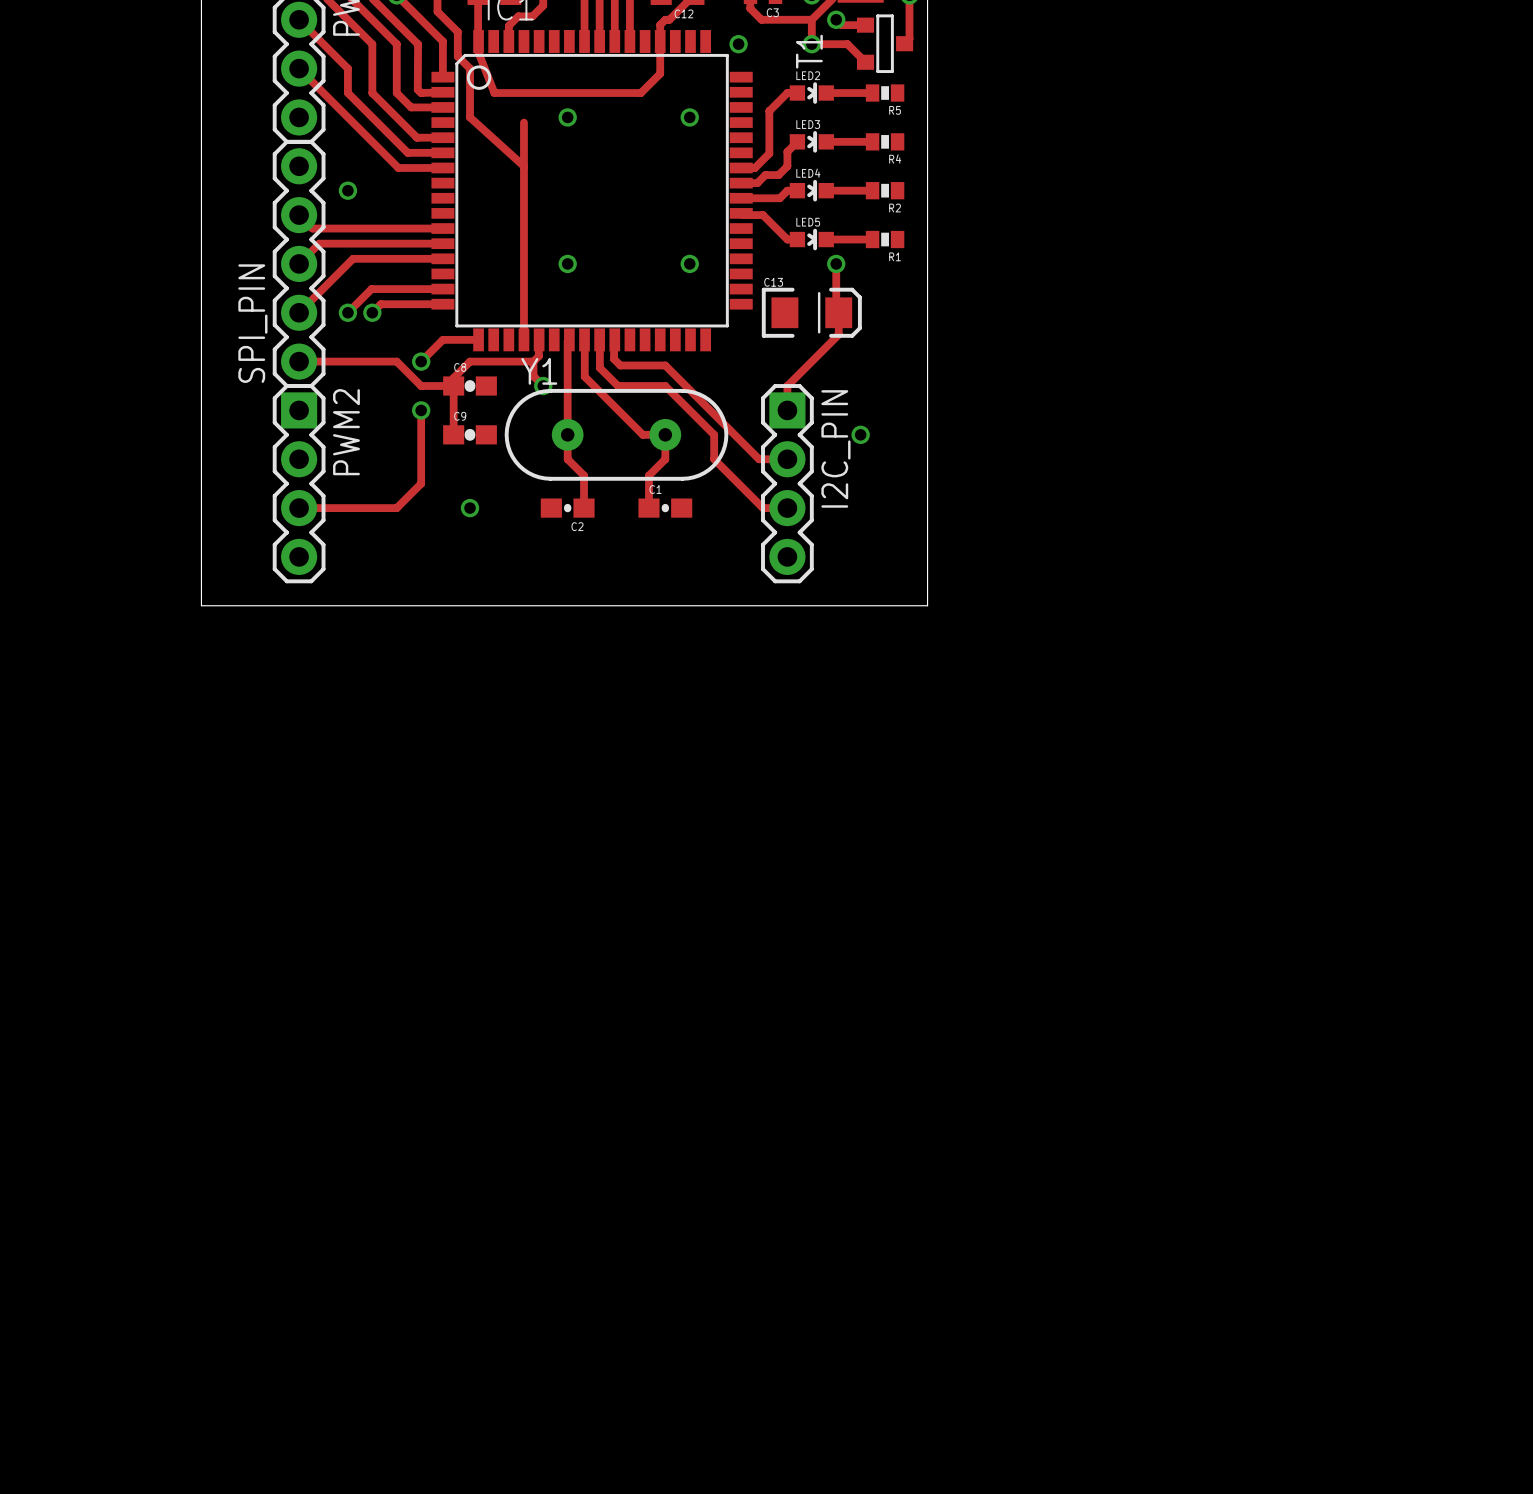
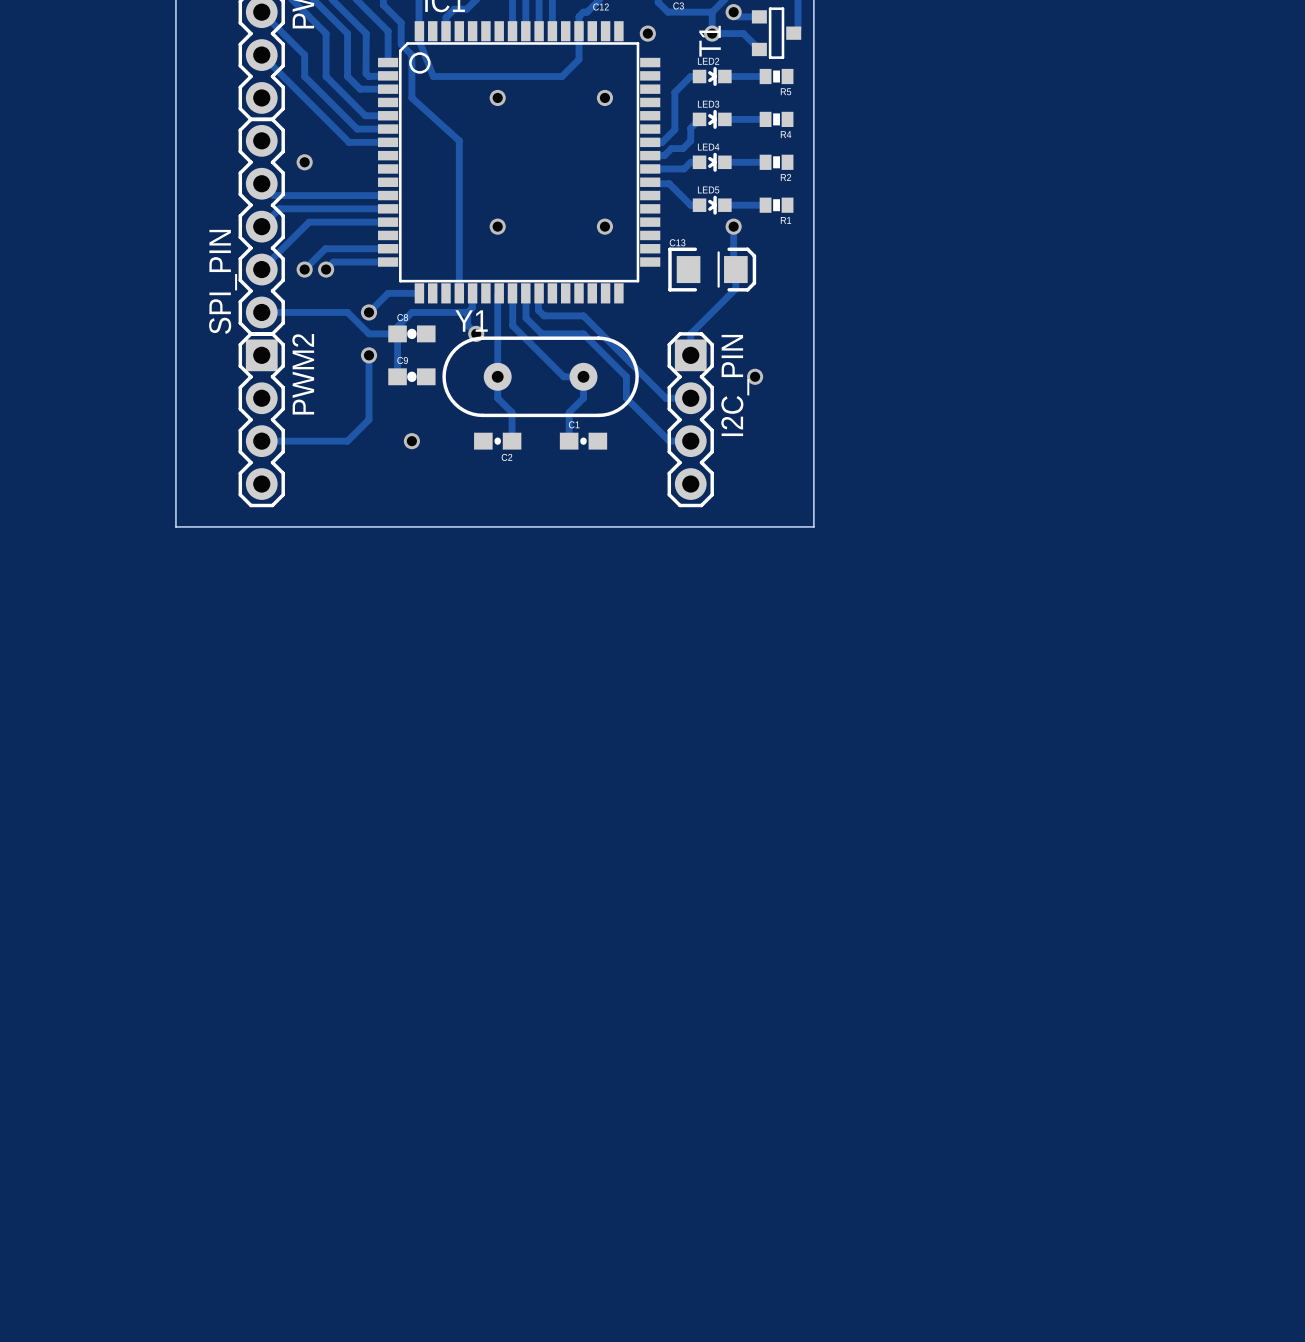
track: (523, 122) (523, 166) -> none

